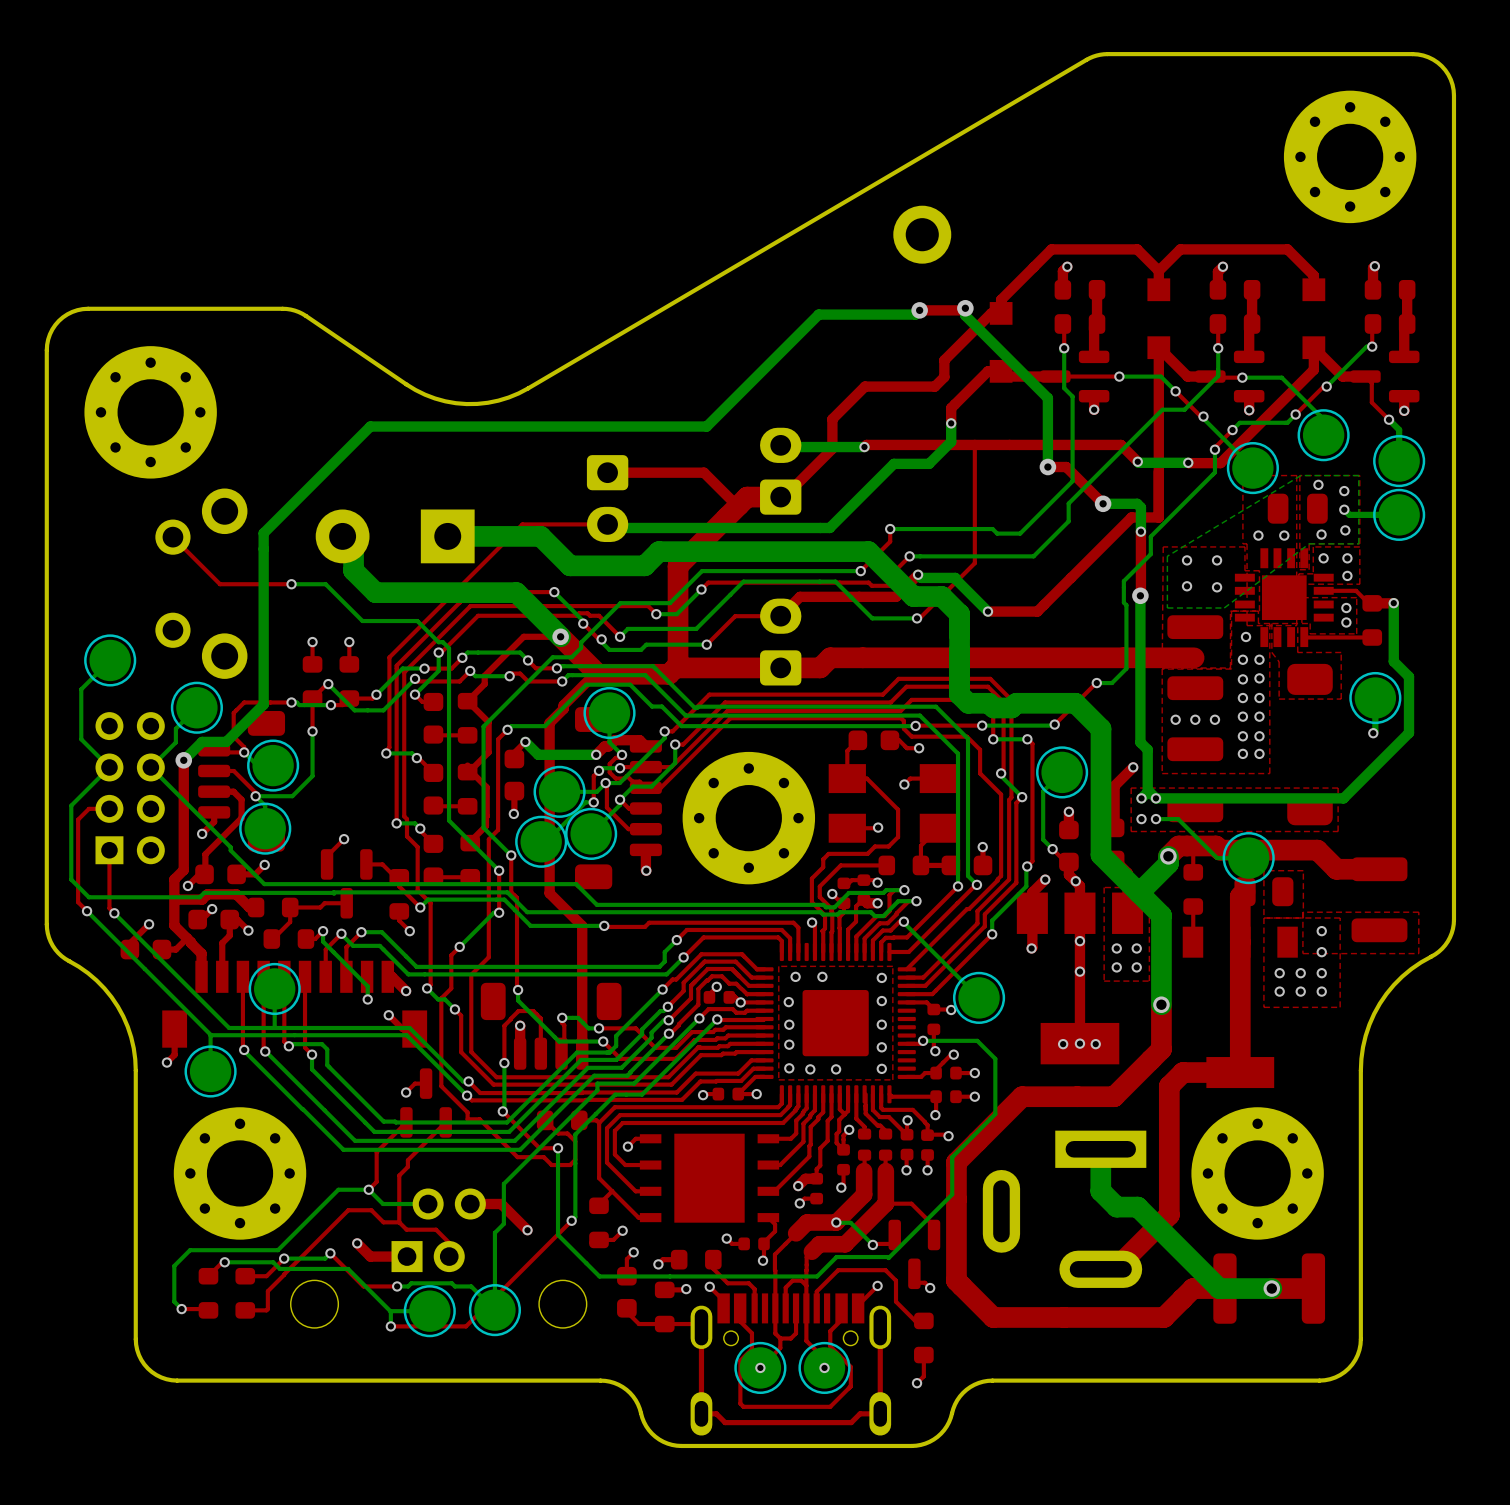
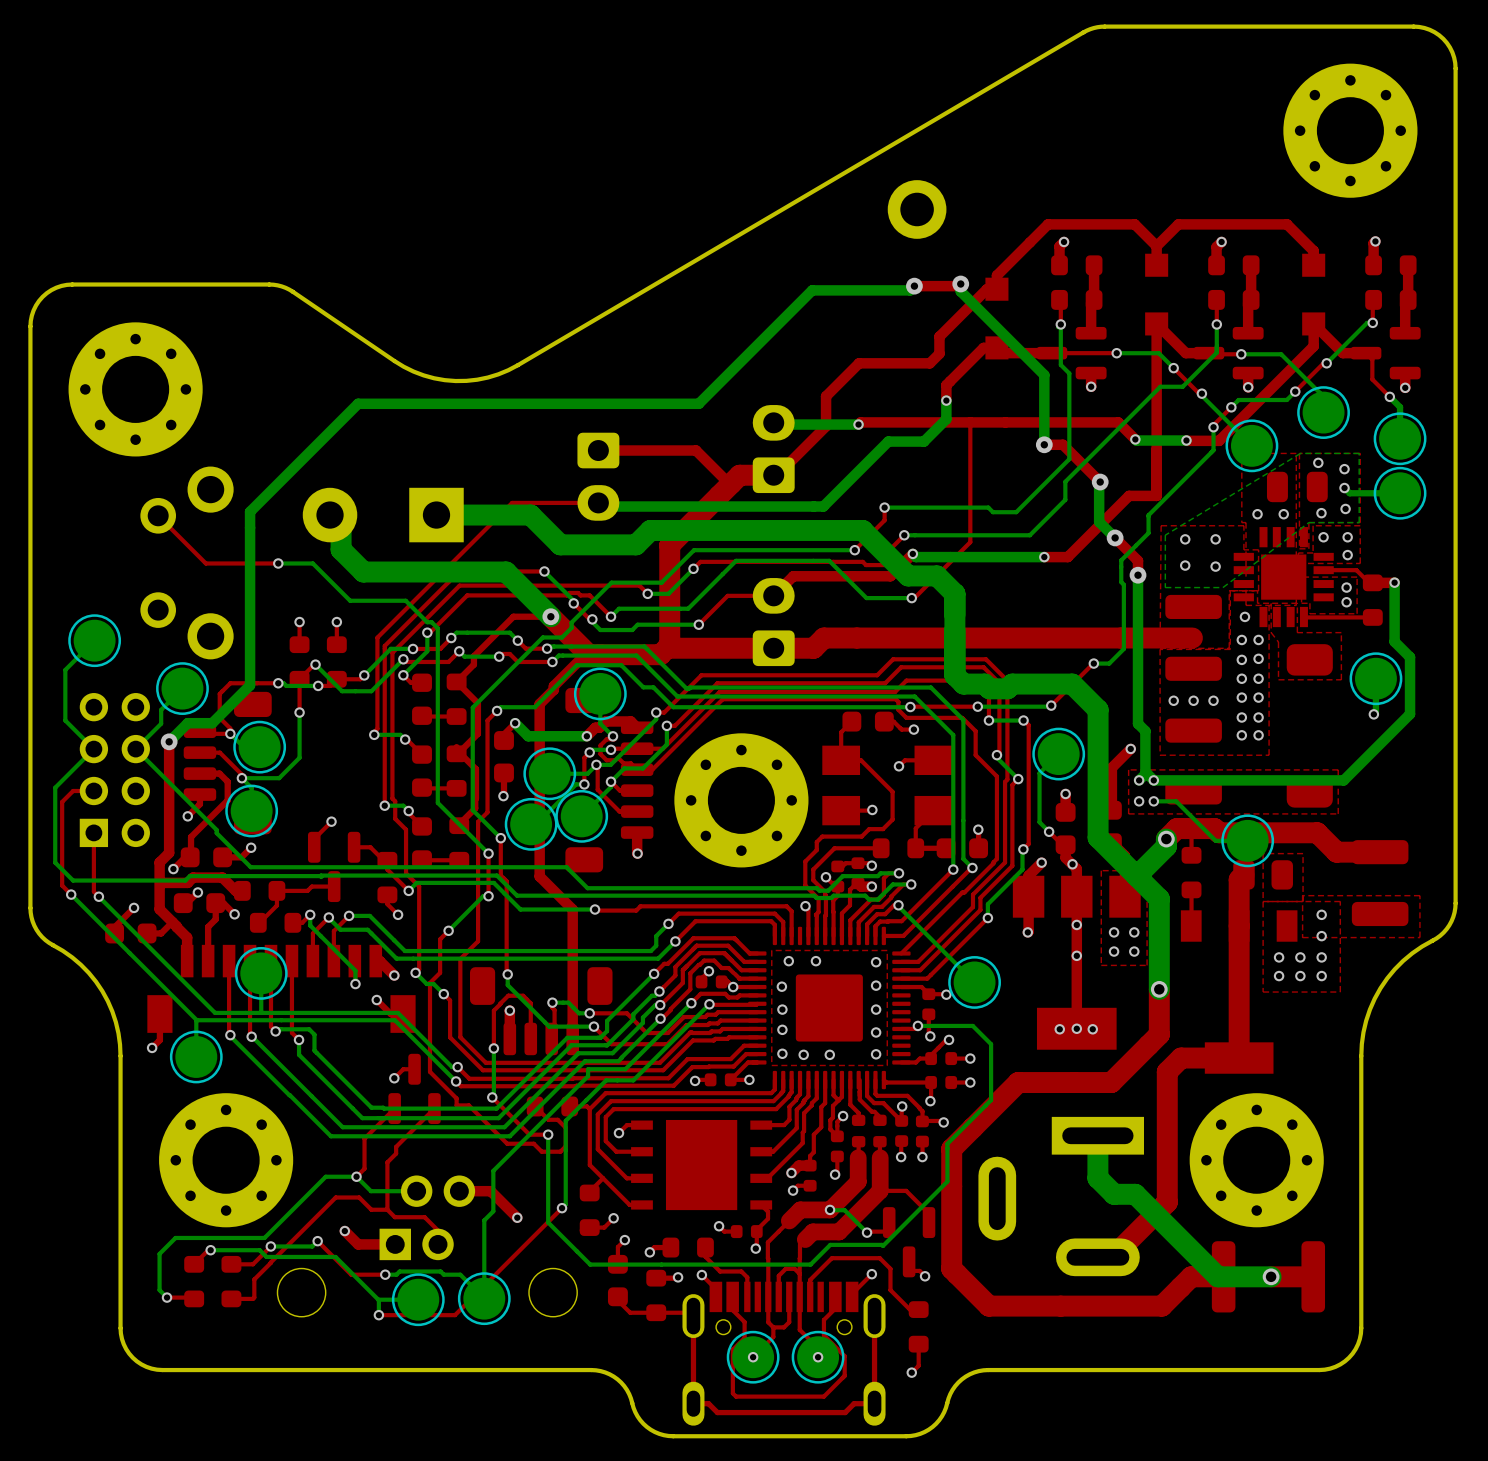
bottom track: (1103, 503) (1137, 503) (1140, 507) (1140, 531) -> none
bottom track: none -> (1099, 483) (1099, 521) (1115, 537)
top track: (1140, 531) (1140, 595) -> (1115, 537) (1138, 560) (1138, 575)
via: (1140, 531) -> none
via: none -> (1115, 537)
bottom track: (955, 577) (987, 611) -> (950, 557) (1044, 557)
via: none -> (1044, 557)
top track: (1071, 577) (1037, 611) (987, 611) -> (1067, 557) (1044, 557)
via: (987, 611) -> none

